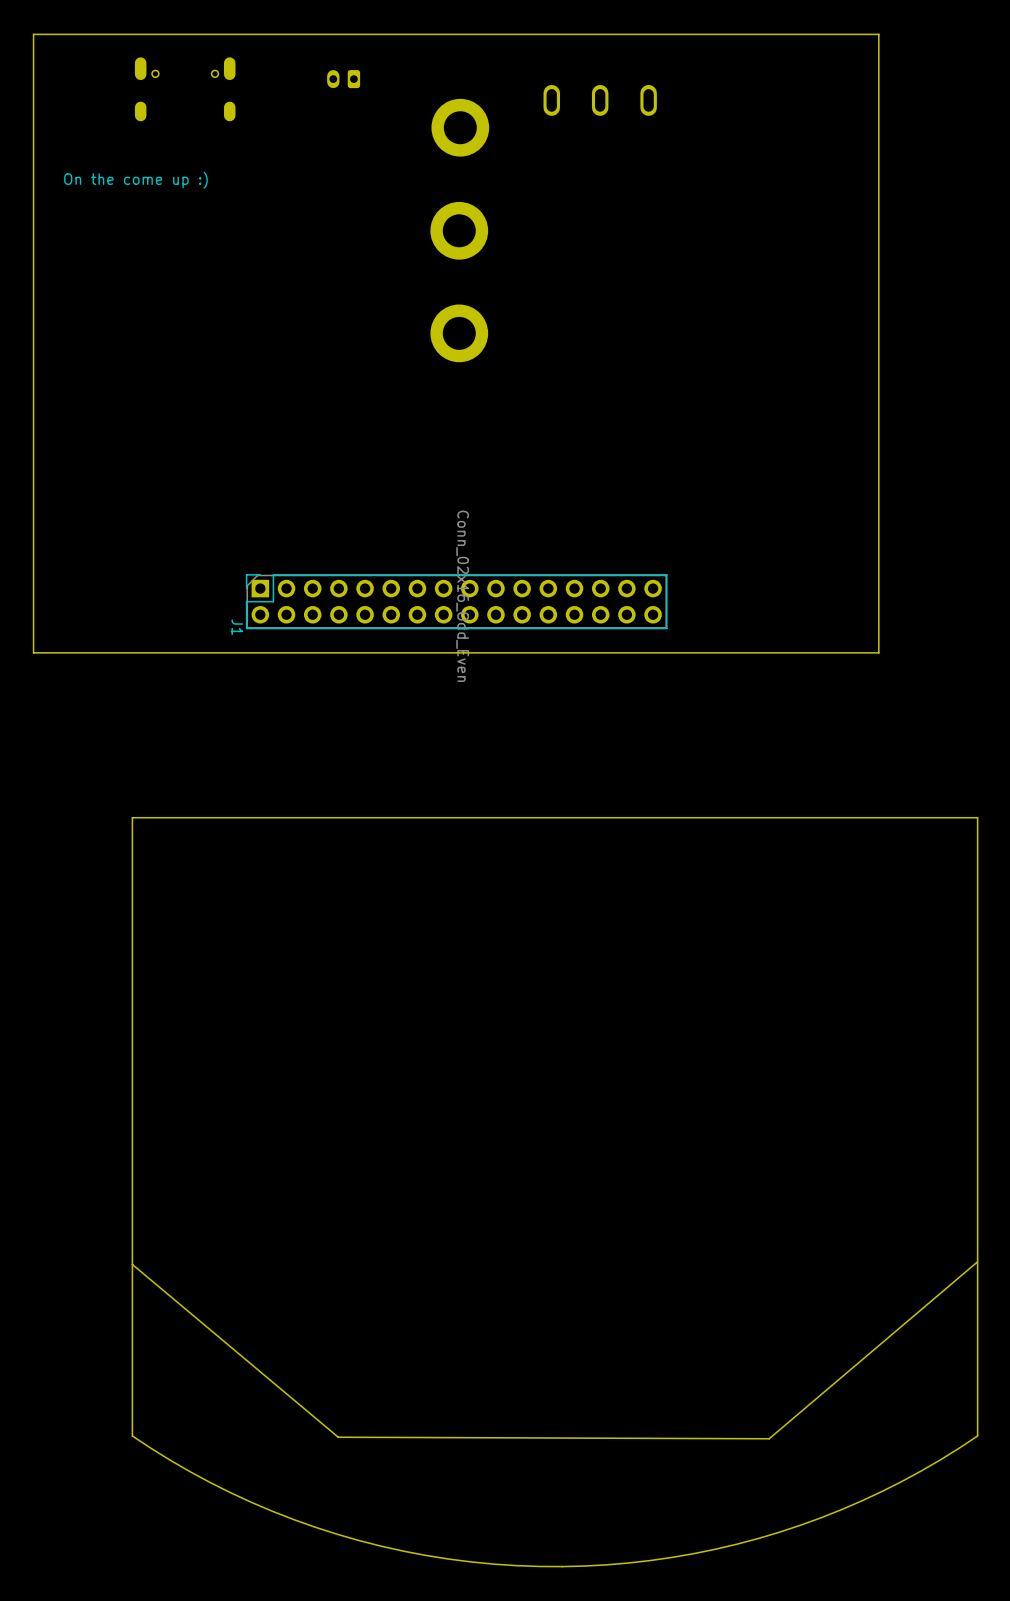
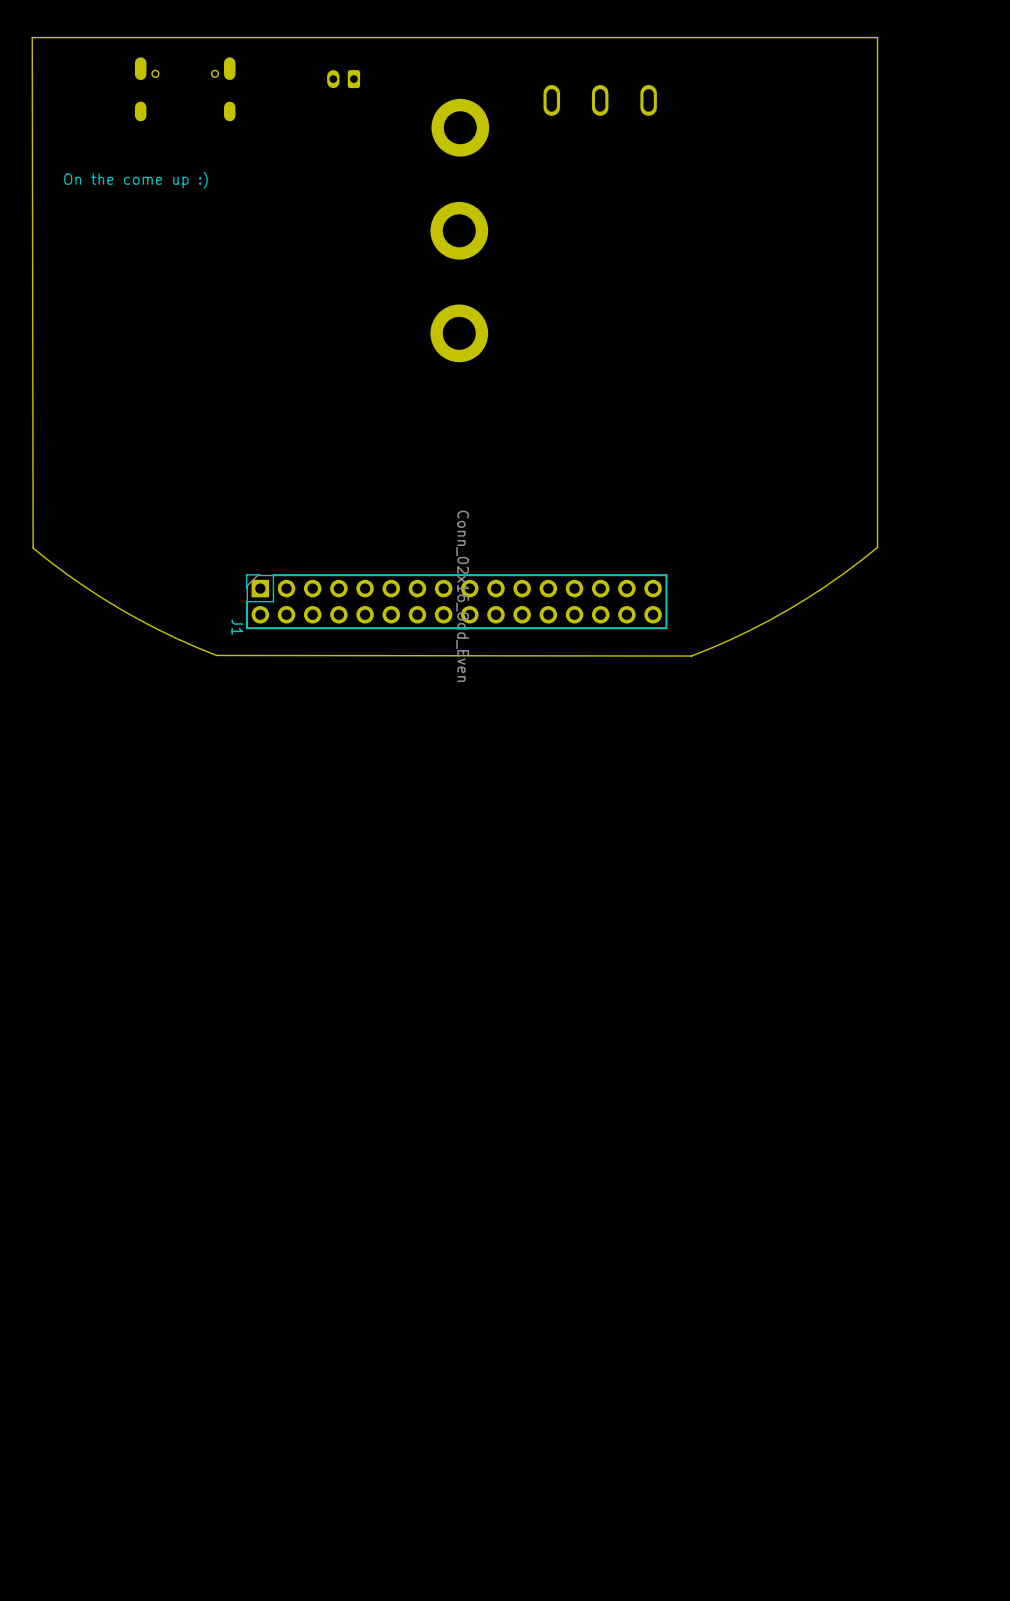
board edge: (878, 34) (33, 34) (33, 652) (878, 652) (878, 34) -> (877, 37) (877, 547) (825, 586) (789, 609) (731, 639) (691, 656) (216, 655) (158, 629) (120, 609) (66, 574) (33, 548) (32, 37) (877, 37)
board edge: (977, 1262) (769, 1438) (338, 1437) (132, 1264) -> none
board edge: (132, 1435) (132, 817) (977, 817) (977, 1435) (940, 1459) (882, 1491) (821, 1517) (779, 1532) (737, 1544) (672, 1557) (606, 1564) (562, 1566) (493, 1564) (448, 1559) (403, 1551) (337, 1534) (294, 1519) (231, 1492) (190, 1472) (132, 1436) -> none

